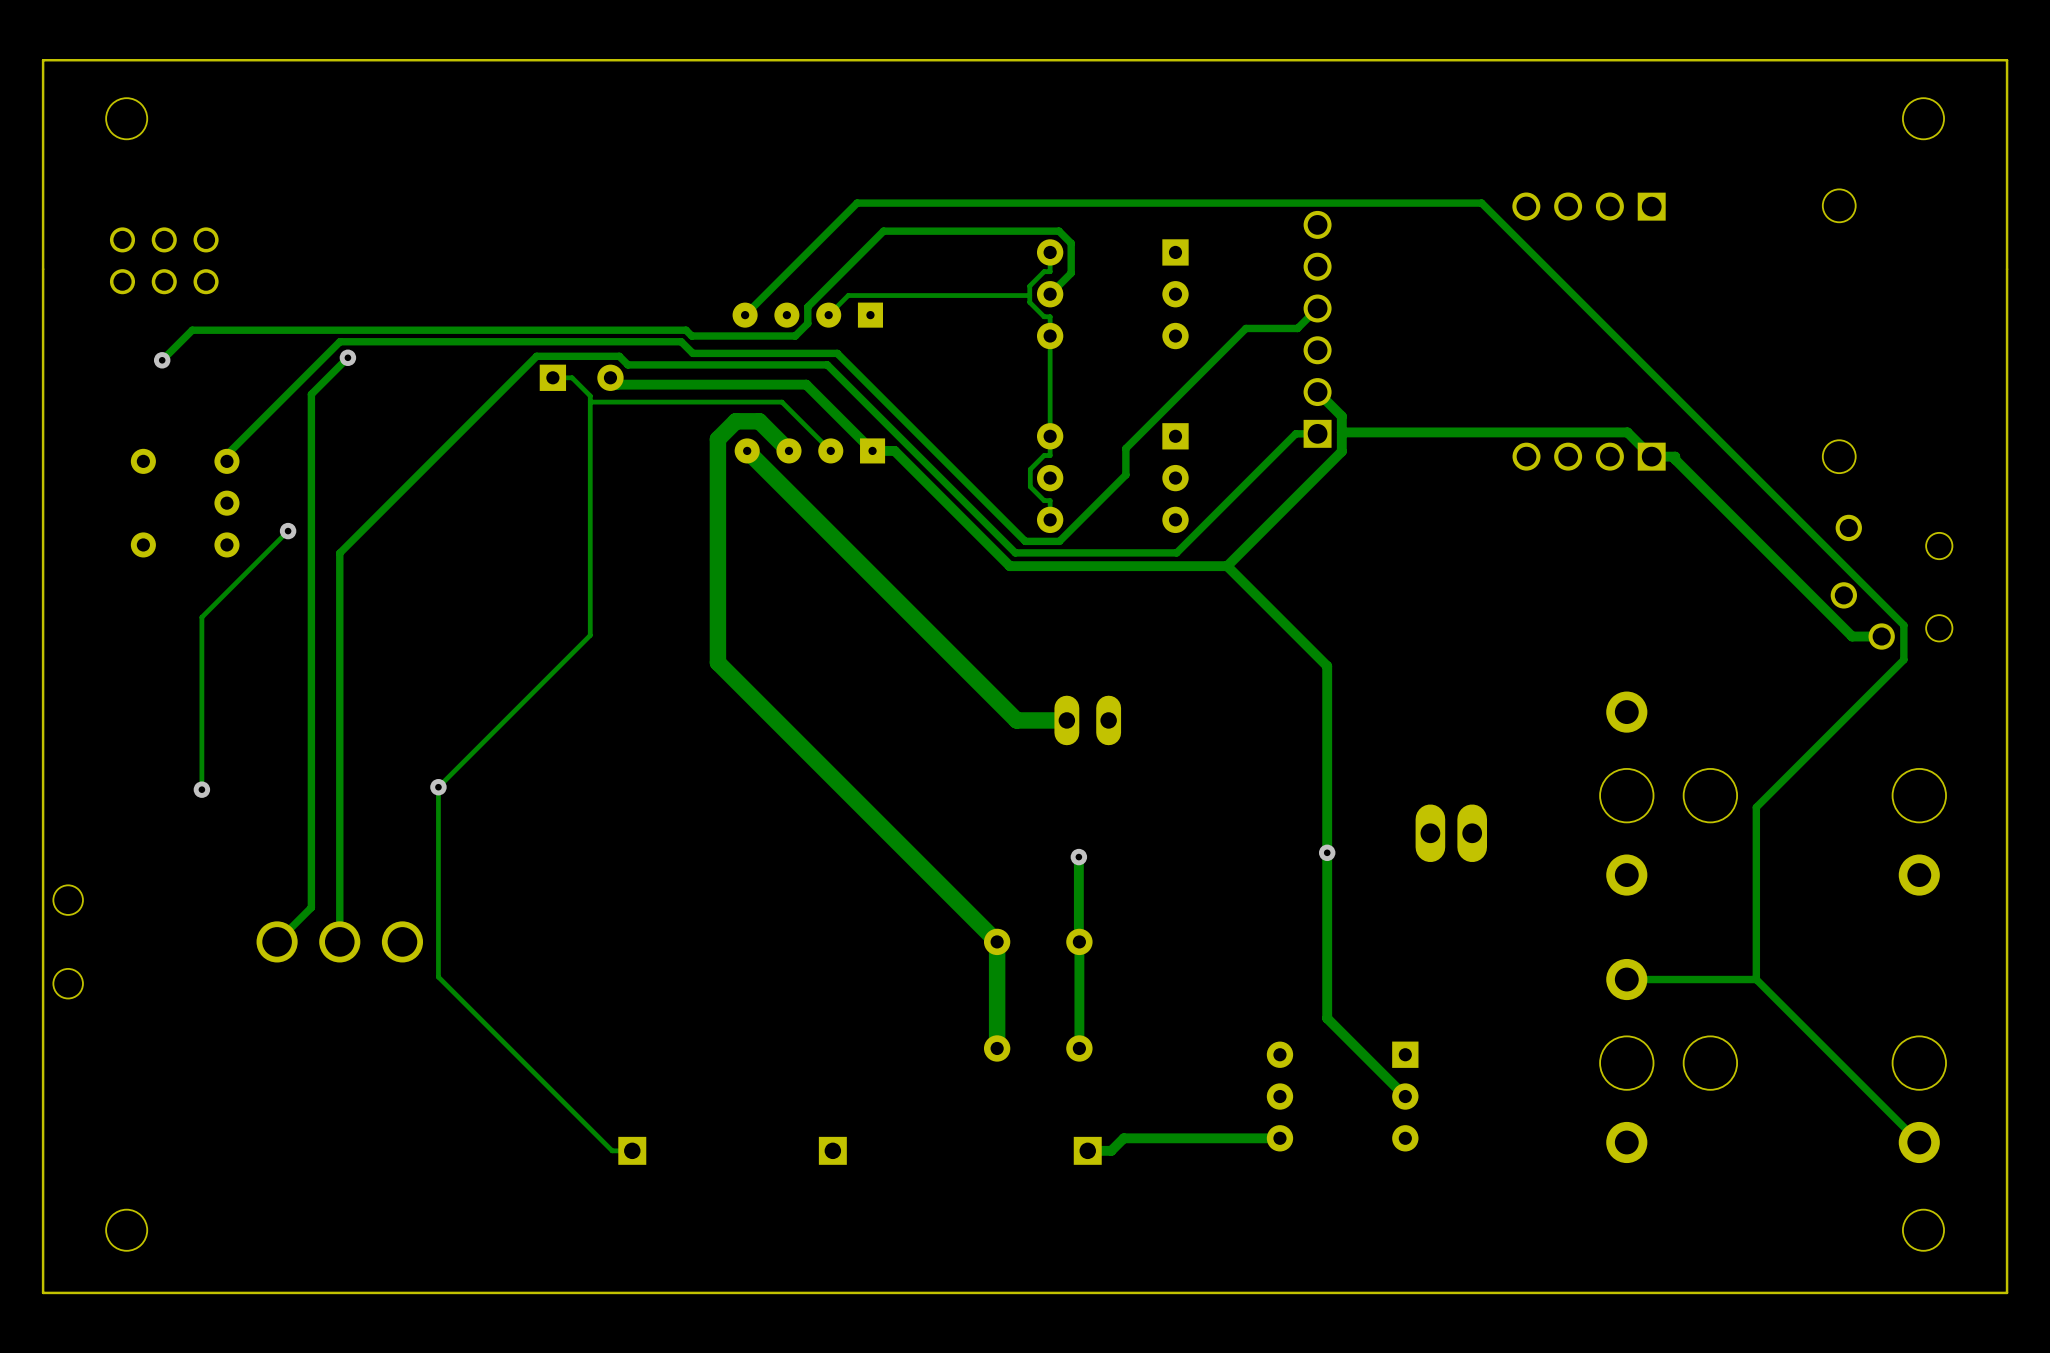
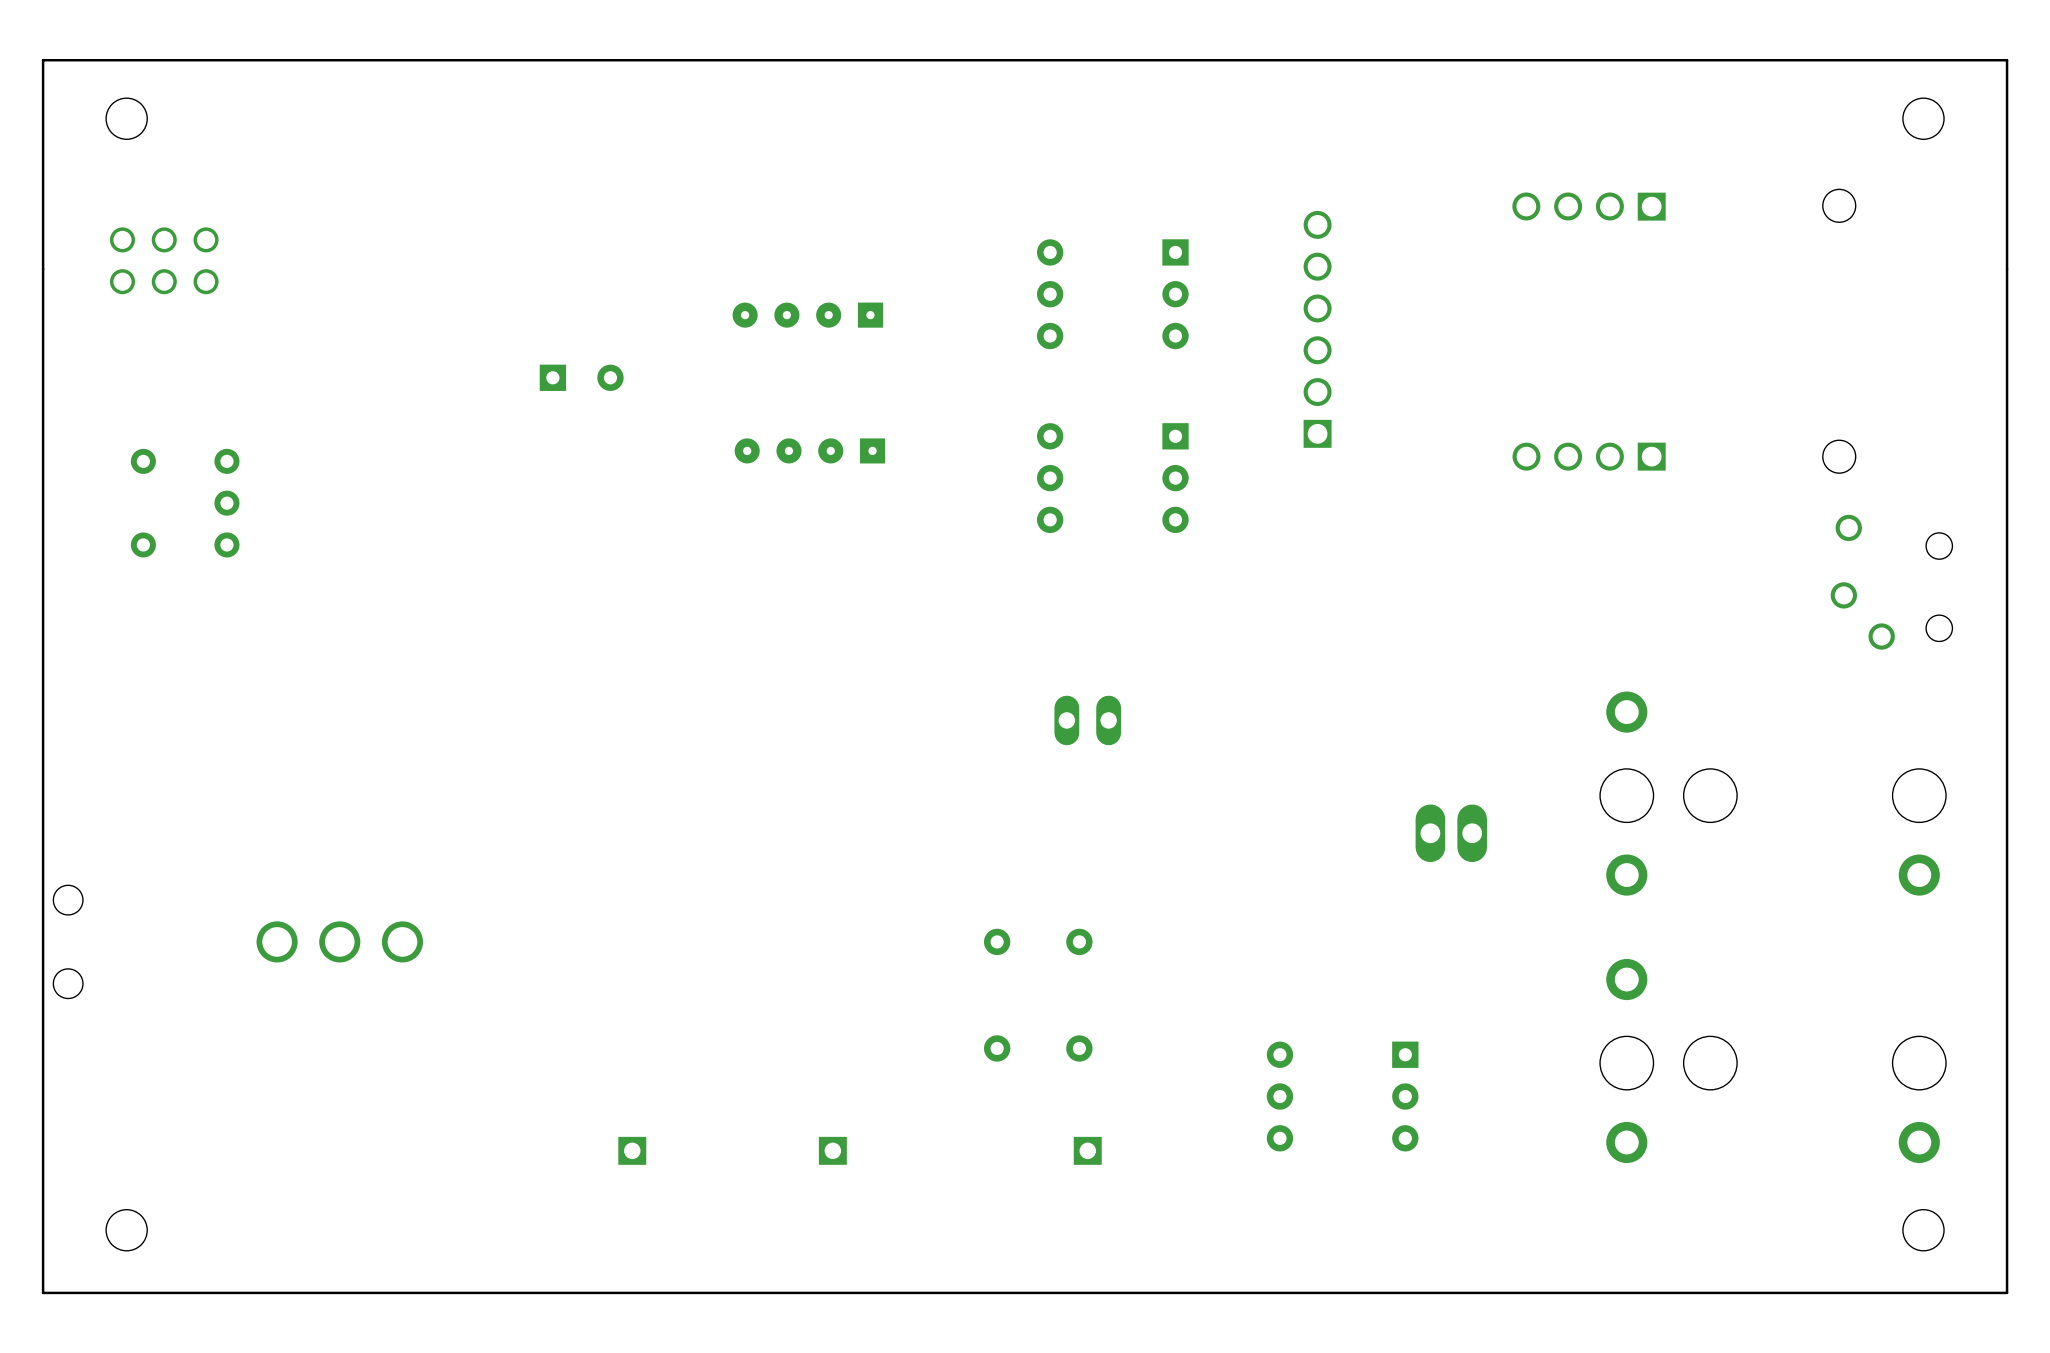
track: (1050, 252) (1050, 271) (1044, 271) (1029, 286) (1029, 302) (1044, 316) (1050, 316) (1050, 455) (1044, 455) (1030, 469) (1030, 486) (1044, 500) (1050, 500) (1050, 519) -> none
track: (1050, 294) (1071, 273) (1071, 243) (1059, 231) (883, 231) (807, 306) (807, 323) (795, 336) (691, 336) (686, 330) (192, 330) (162, 360) -> none
track: (1029, 295) (848, 295) (828, 315) -> none
track: (1317, 308) (1297, 328) (1245, 328) (1125, 448) (1125, 474) (1059, 541) (1025, 541) (837, 353) (692, 353) (681, 341) (339, 341) (226, 454) (226, 461) -> none
track: (745, 315) (857, 203) (1481, 203) (1903, 625) (1903, 659) (1756, 807) (1756, 979) -> none
track: (347, 357) (311, 394) (311, 907) (277, 941) -> none
via: (347, 357) -> none
via: (162, 360) -> none
track: (552, 377) (572, 377) (590, 395) (590, 635) (438, 787) (438, 977) (612, 1150) (632, 1150) -> none
track: (610, 377) (617, 384) (806, 384) (872, 450) (894, 450) (1009, 566) (1227, 566) -> none
track: (1317, 392) (1341, 416) (1341, 451) (1227, 566) -> none
track: (590, 402) (781, 402) (830, 450) -> none
track: (1341, 432) (1627, 432) (1651, 456) (1675, 456) (1675, 459) (1852, 636) (1881, 636) -> none
track: (1317, 433) (1295, 433) (1176, 552) (1015, 552) (827, 364) (627, 364) (619, 356) (536, 356) (339, 553) (339, 941) -> none
track: (747, 450) (1016, 720) (1066, 720) -> none
track: (788, 450) (759, 421) (735, 421) (717, 439) (717, 662) (997, 941) (997, 1048) -> none
track: (288, 531) (201, 617) (201, 789) -> none
via: (288, 531) -> none
track: (1227, 566) (1327, 666) (1327, 1018) (1405, 1096) -> none
via: (438, 787) -> none
via: (201, 789) -> none
via: (1327, 852) -> none
track: (1078, 857) (1079, 1048) -> none
via: (1078, 857) -> none
track: (1756, 979) (1626, 979) -> none
track: (1756, 979) (1919, 1142) -> none
track: (1279, 1138) (1123, 1138) (1111, 1150) (1087, 1150) -> none

